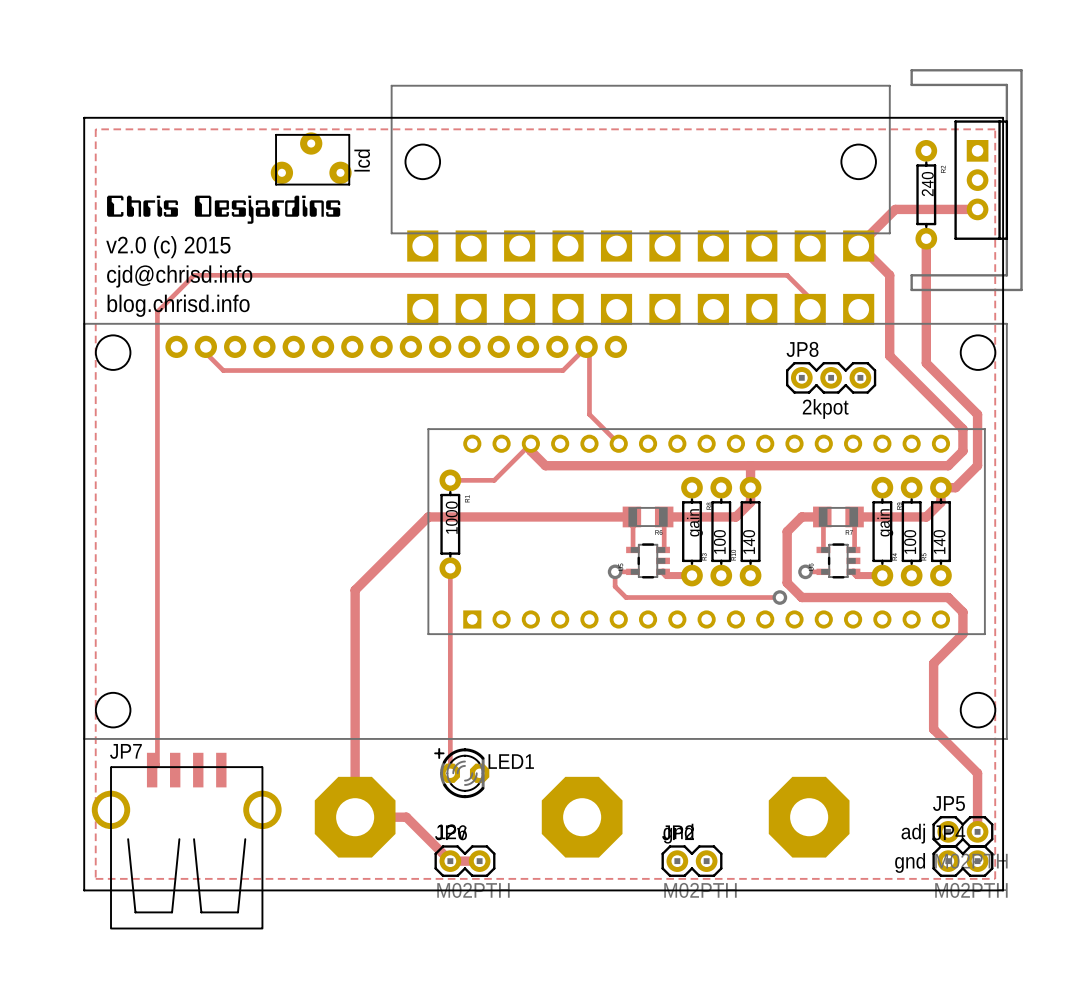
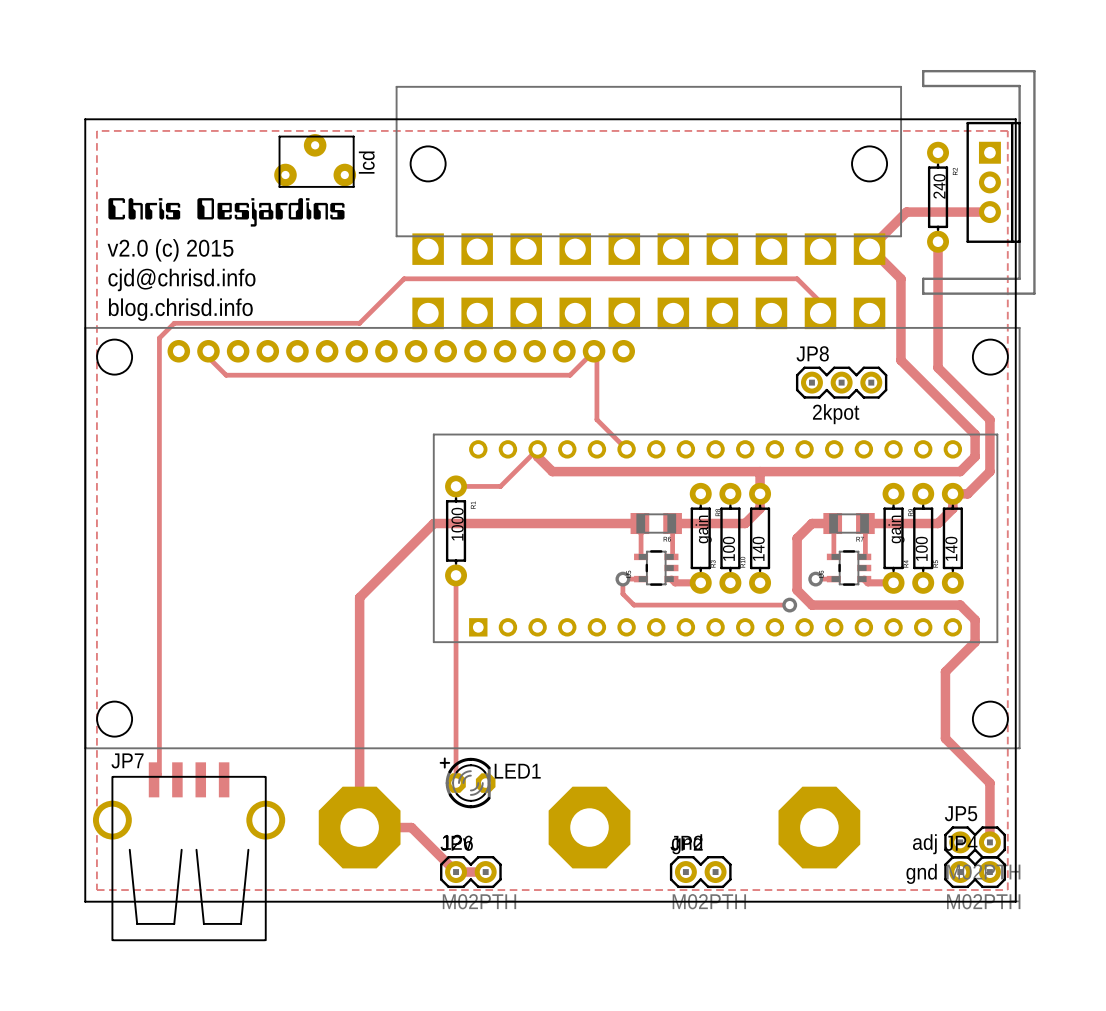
track: (399, 275) (194, 275) (157, 311) (157, 333) -> (404, 278) (359, 323) (174, 323) (159, 338)

